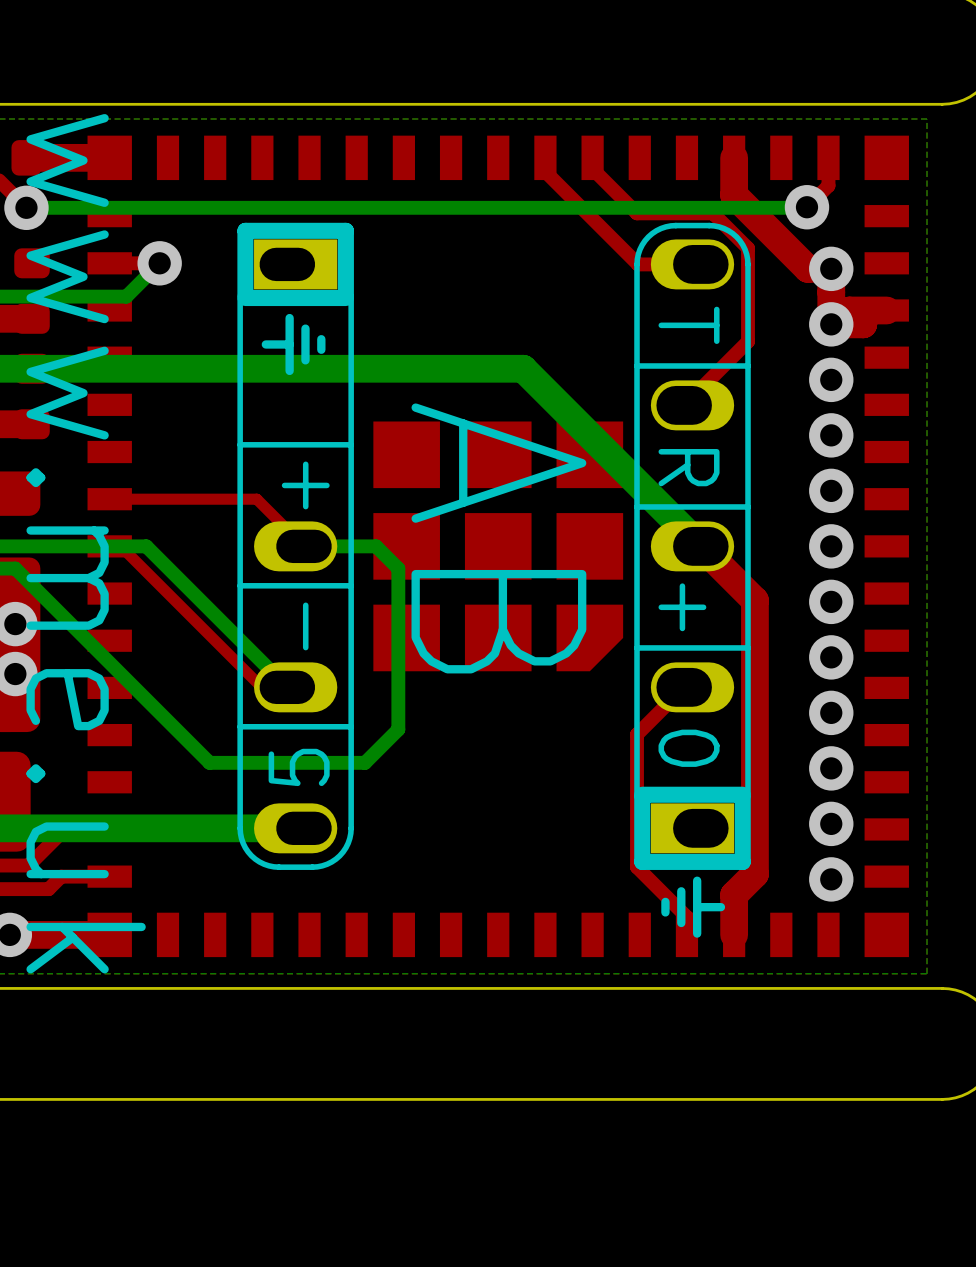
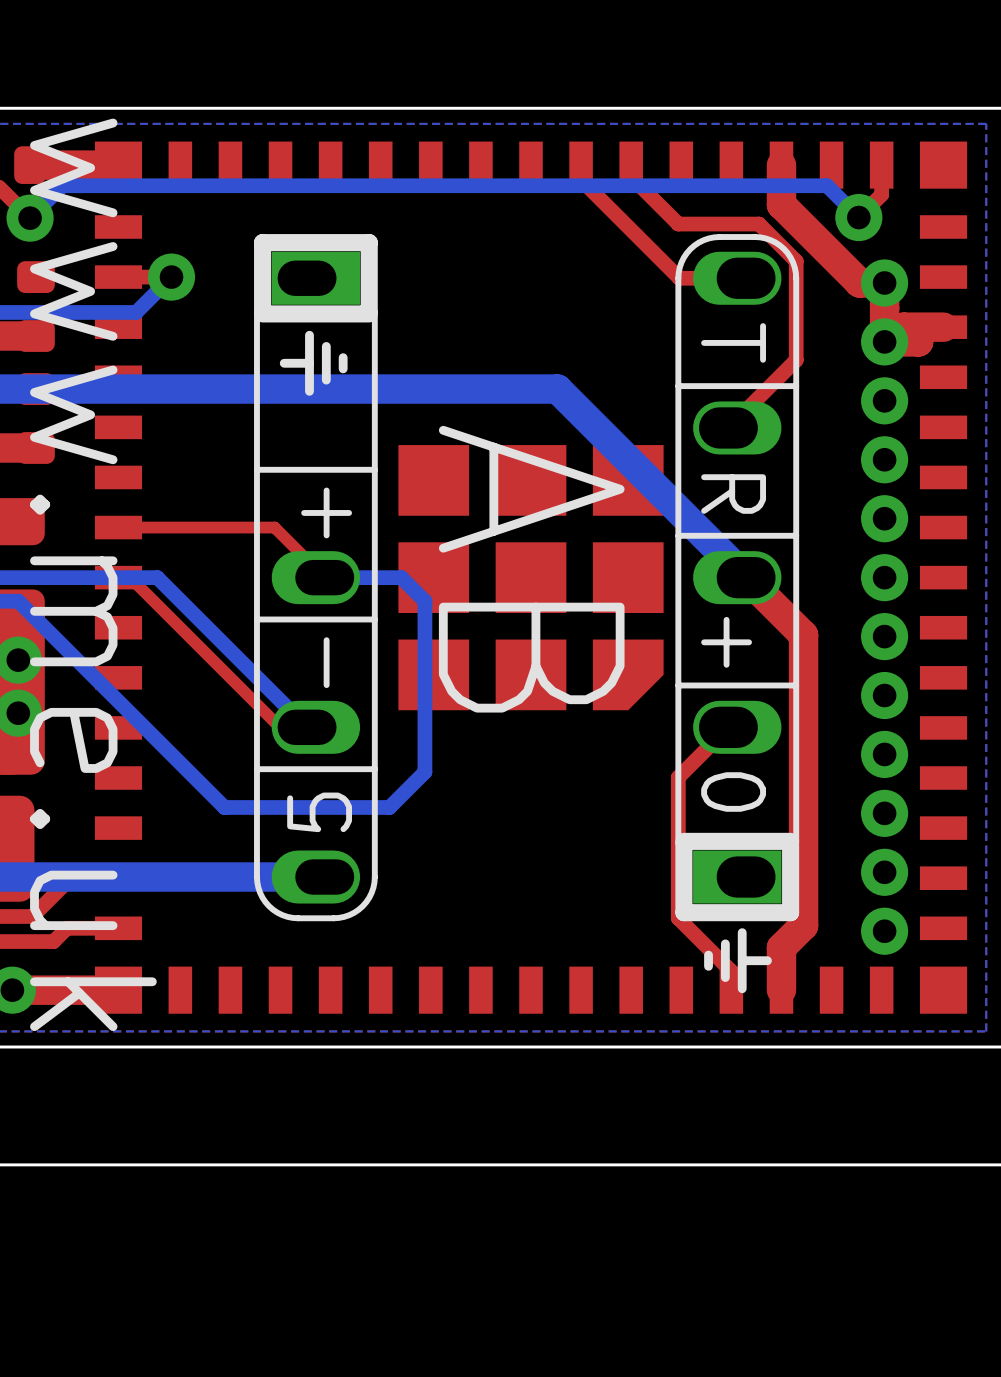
bottom track: (806, 207) (26, 207) -> (858, 217) (827, 185) (62, 185) (30, 218)

